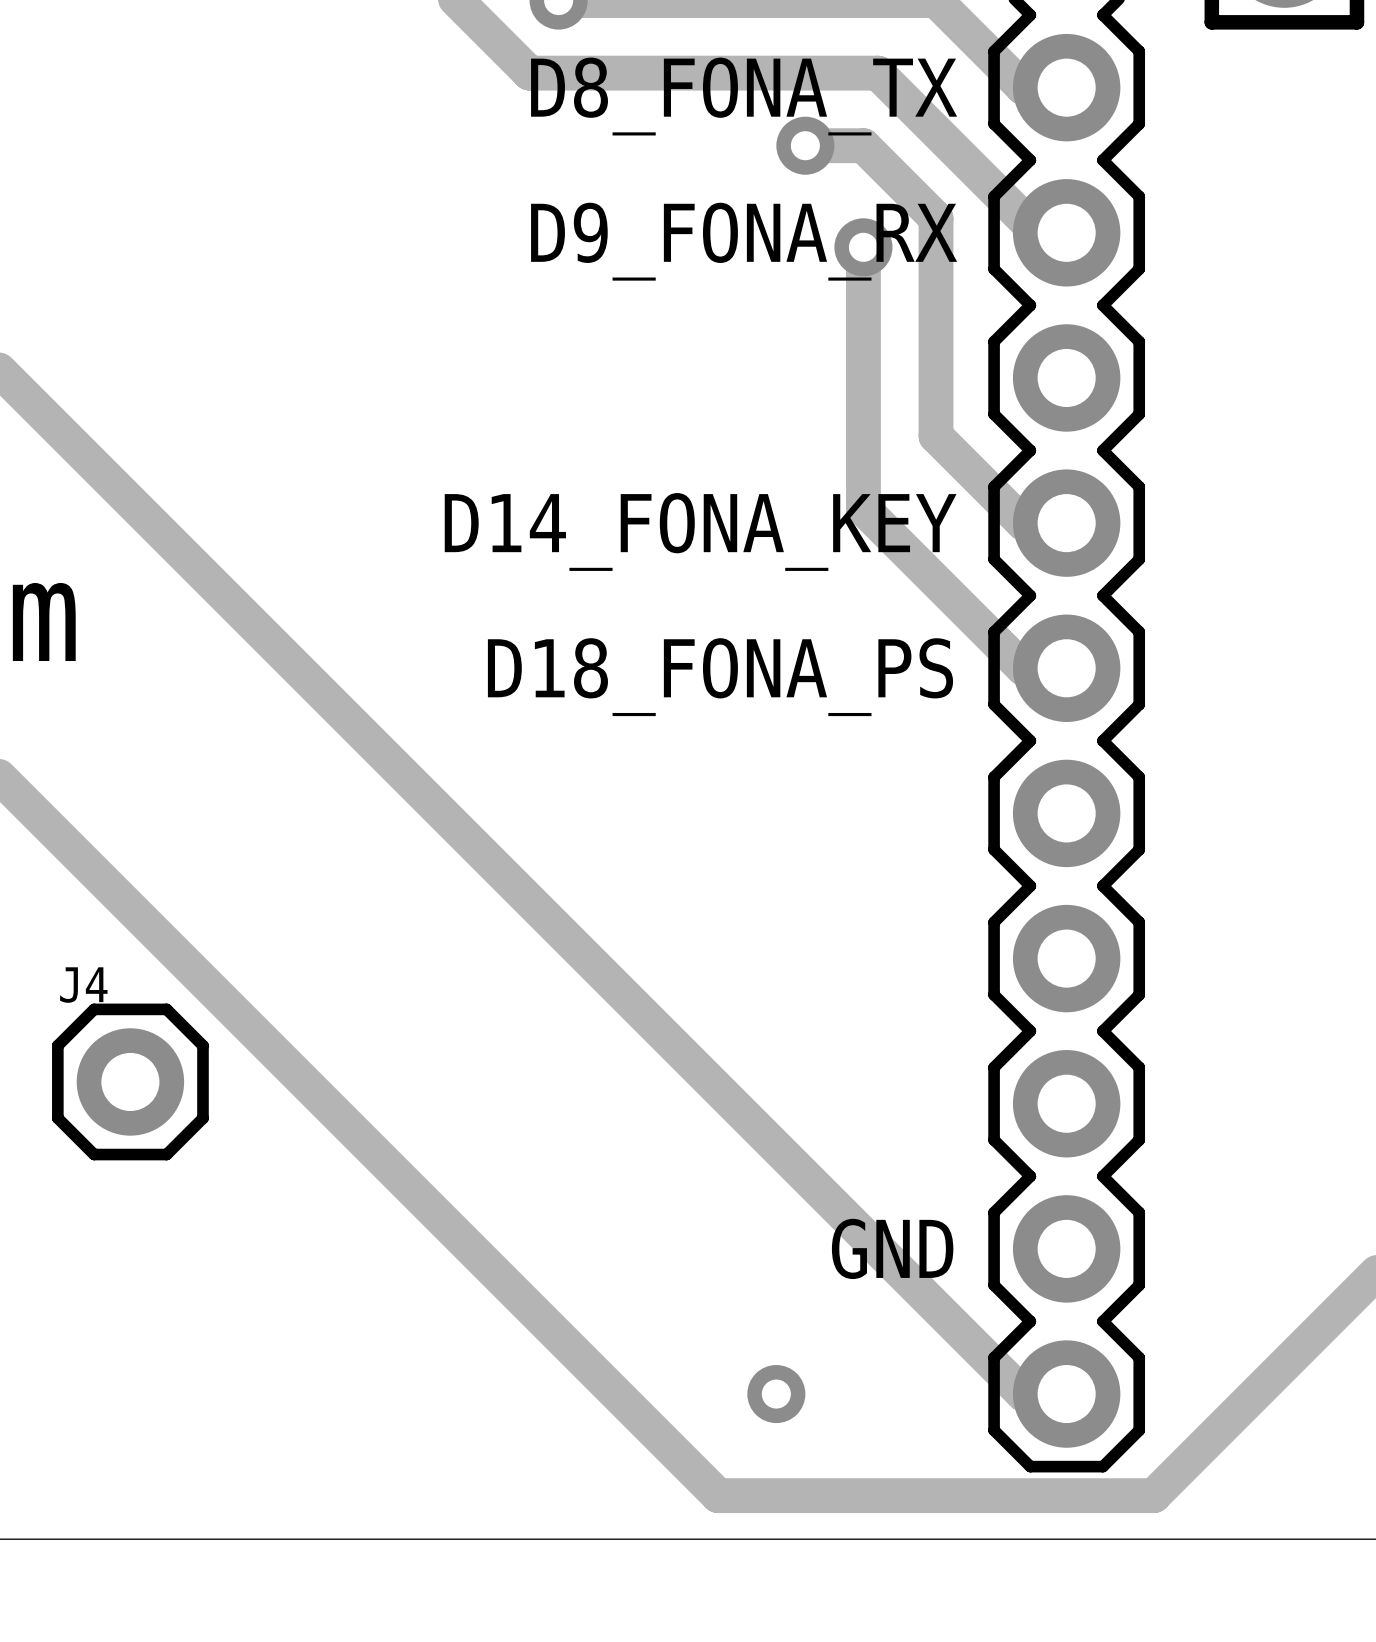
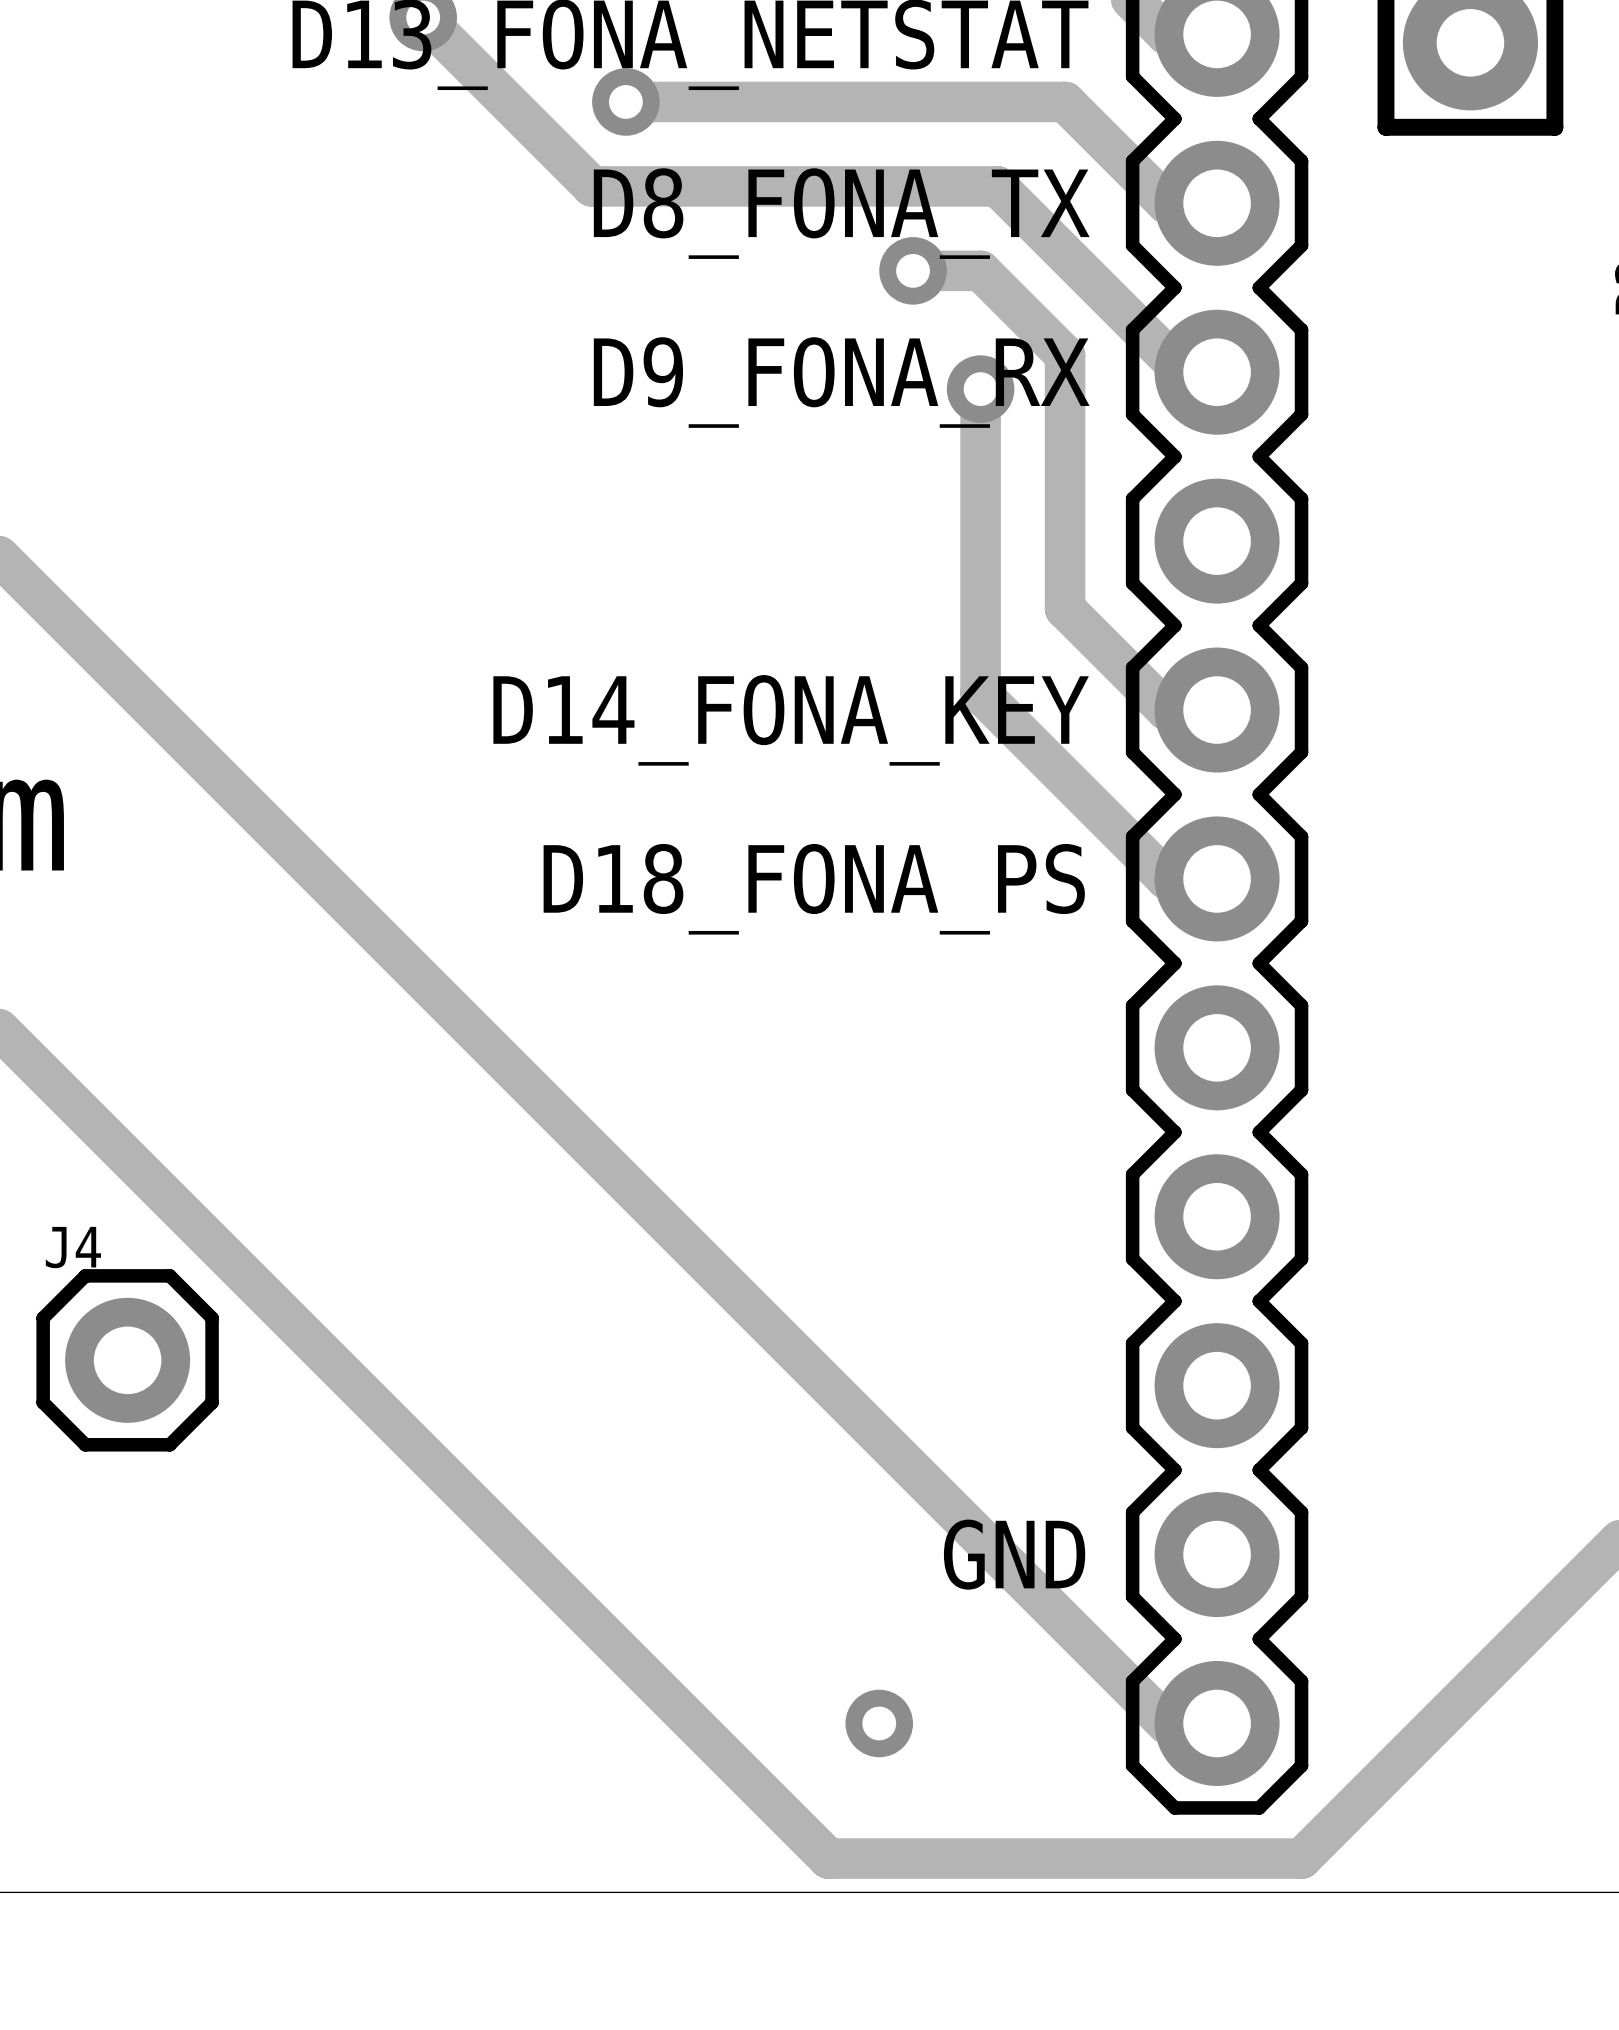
track: (718, 1495) (1153, 1495) -> (811, 1841) (828, 1858) (1301, 1858) (1318, 1841)

